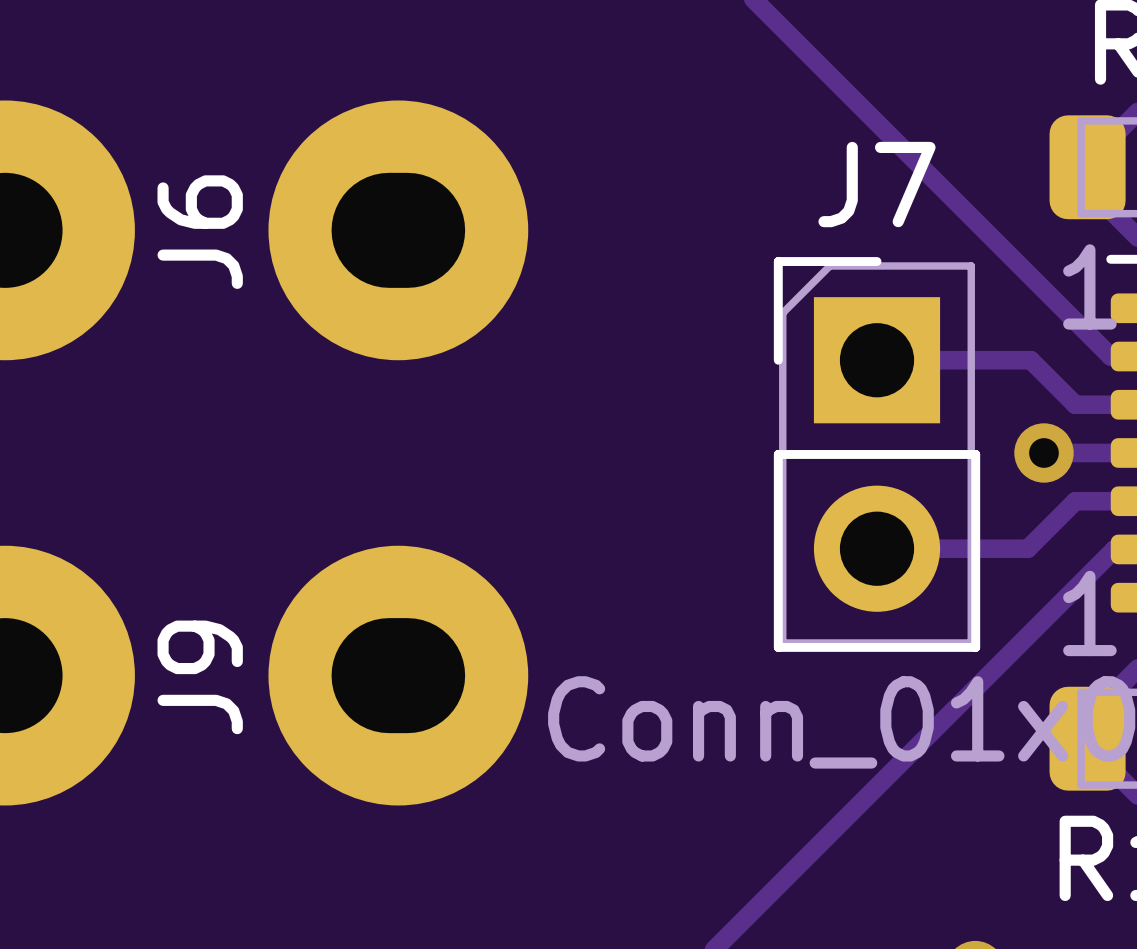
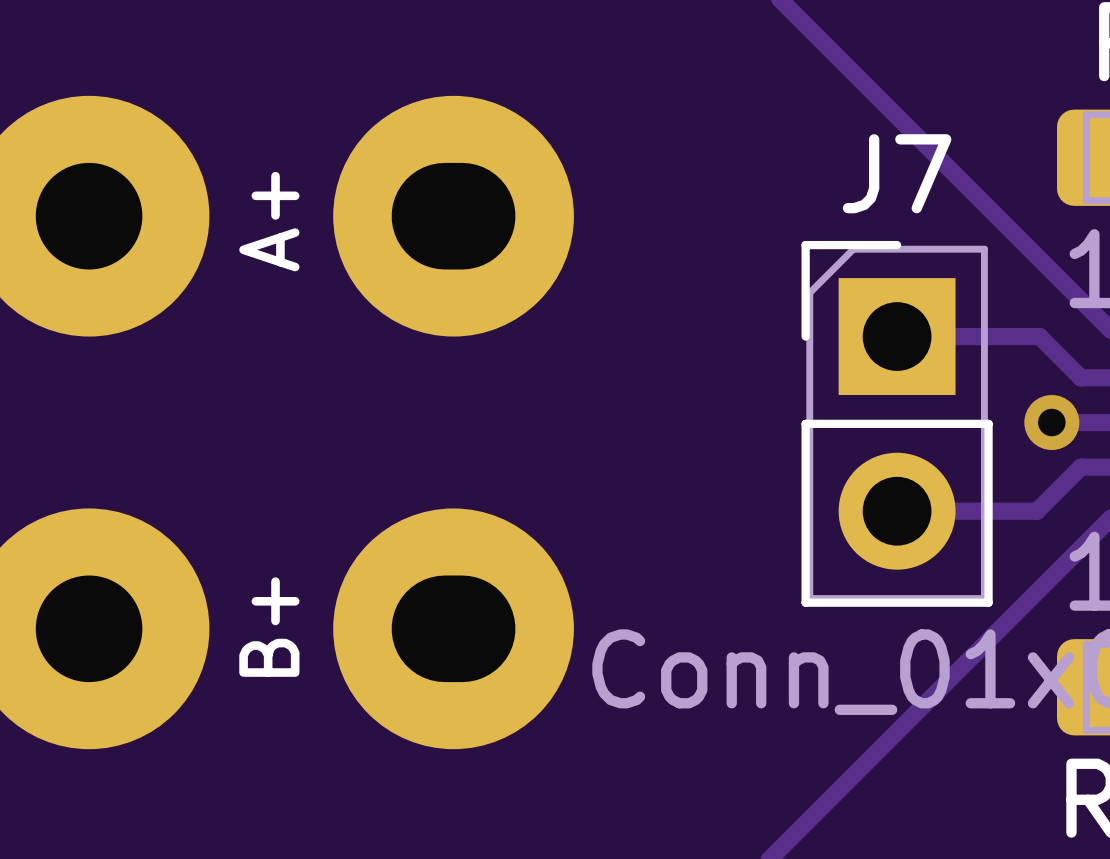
J6 name: J6 (200, 232) -> none
text: none -> A+ (269, 221)
text: none -> B+ (269, 627)
J9 name: J9 (200, 677) -> none

